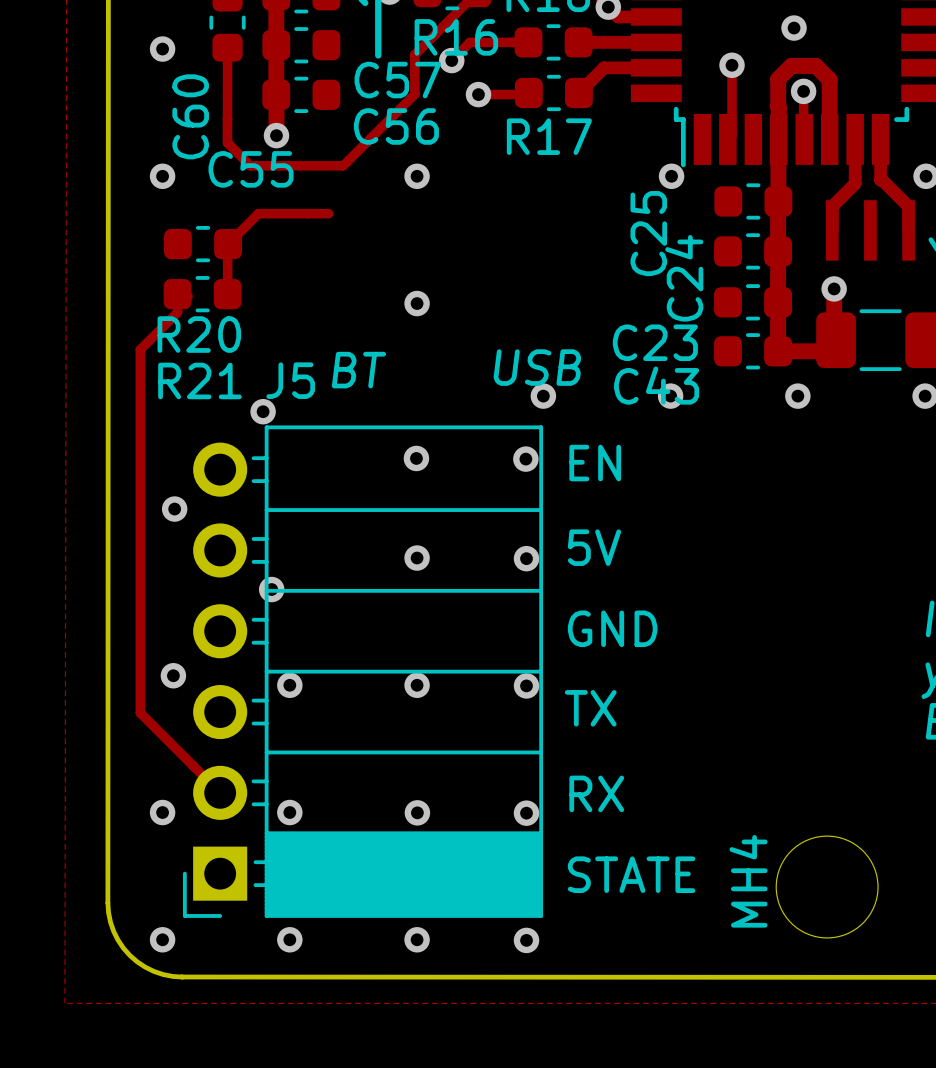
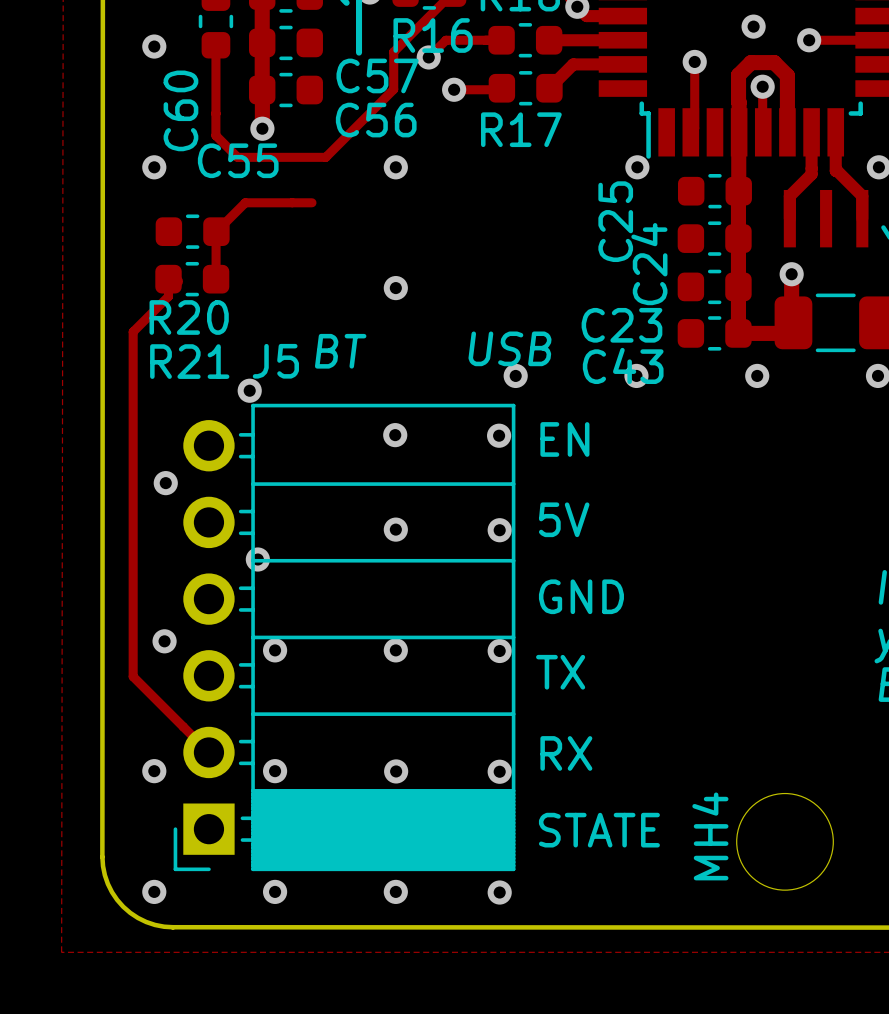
track: none -> (809, 40) (879, 40)
via: none -> (809, 40)

